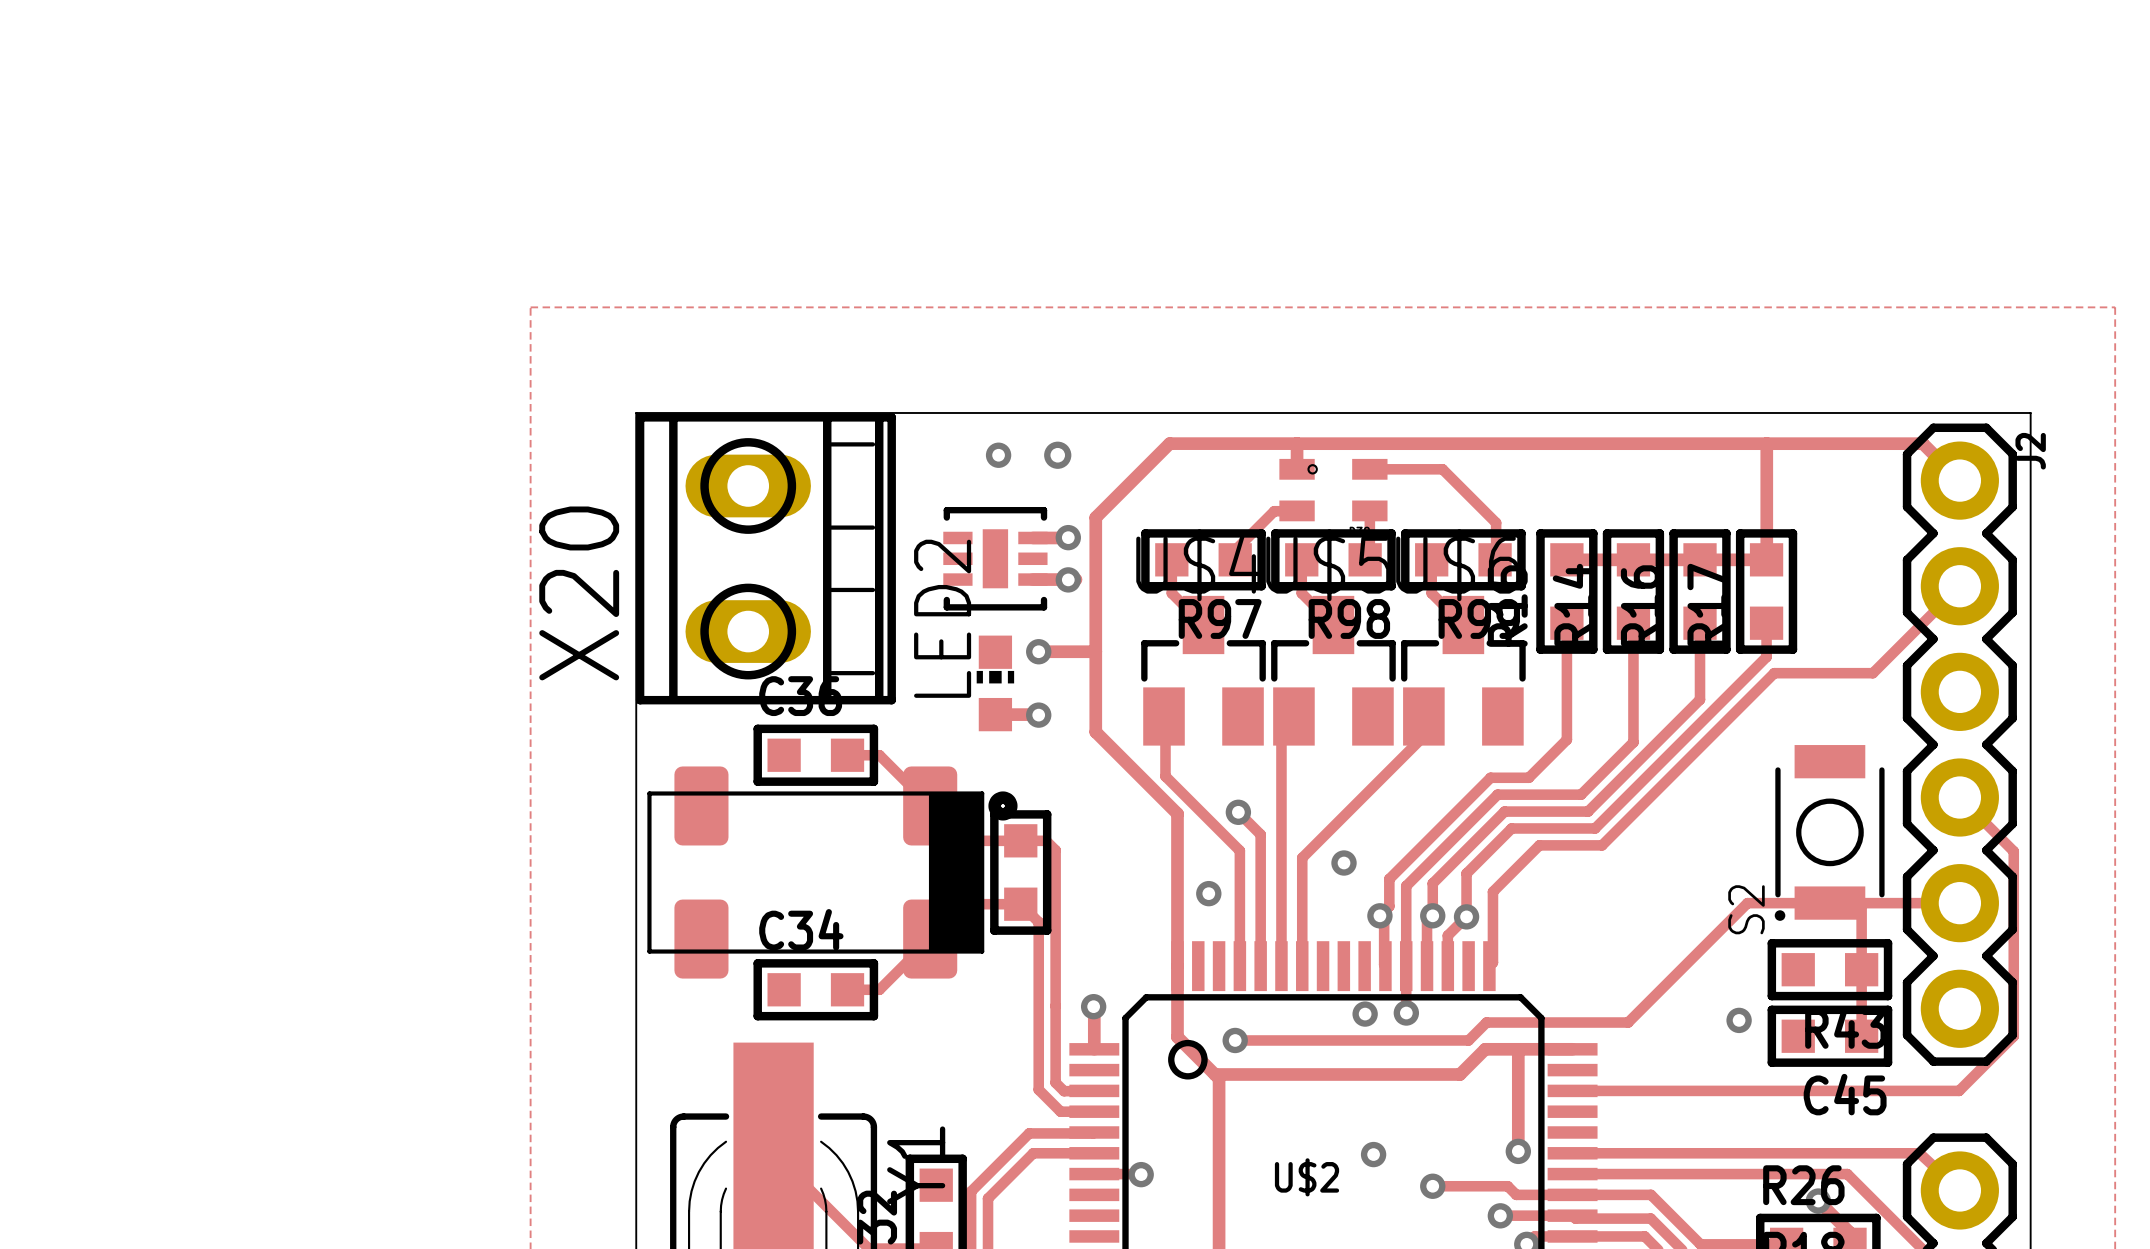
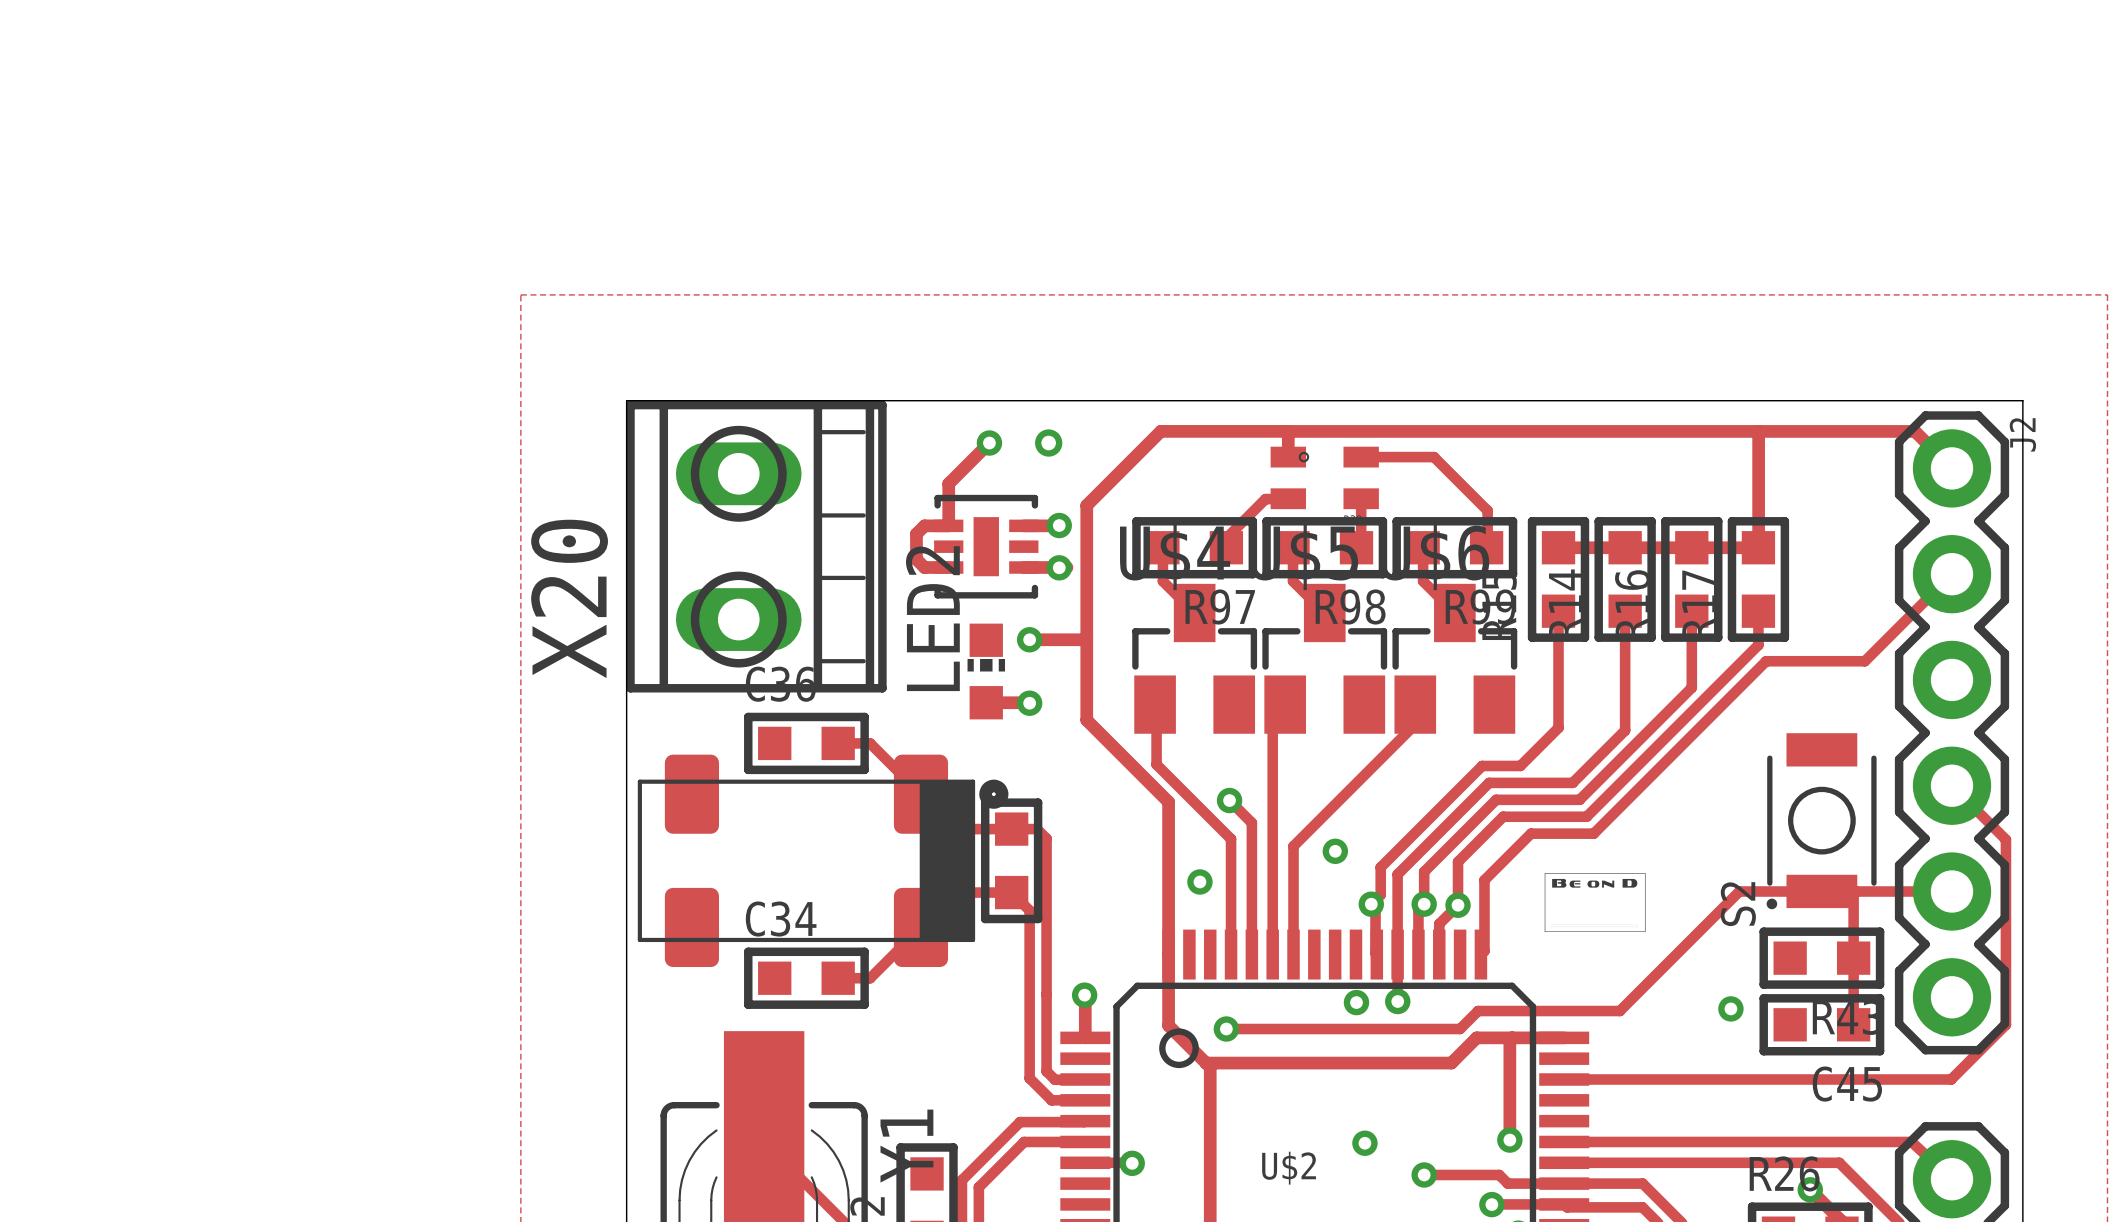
track: none -> (989, 443) (948, 483) (948, 525) (924, 525) (916, 533) (916, 559) (924, 567) (948, 567)
drawing: none -> [1544, 873, 1646, 932]

